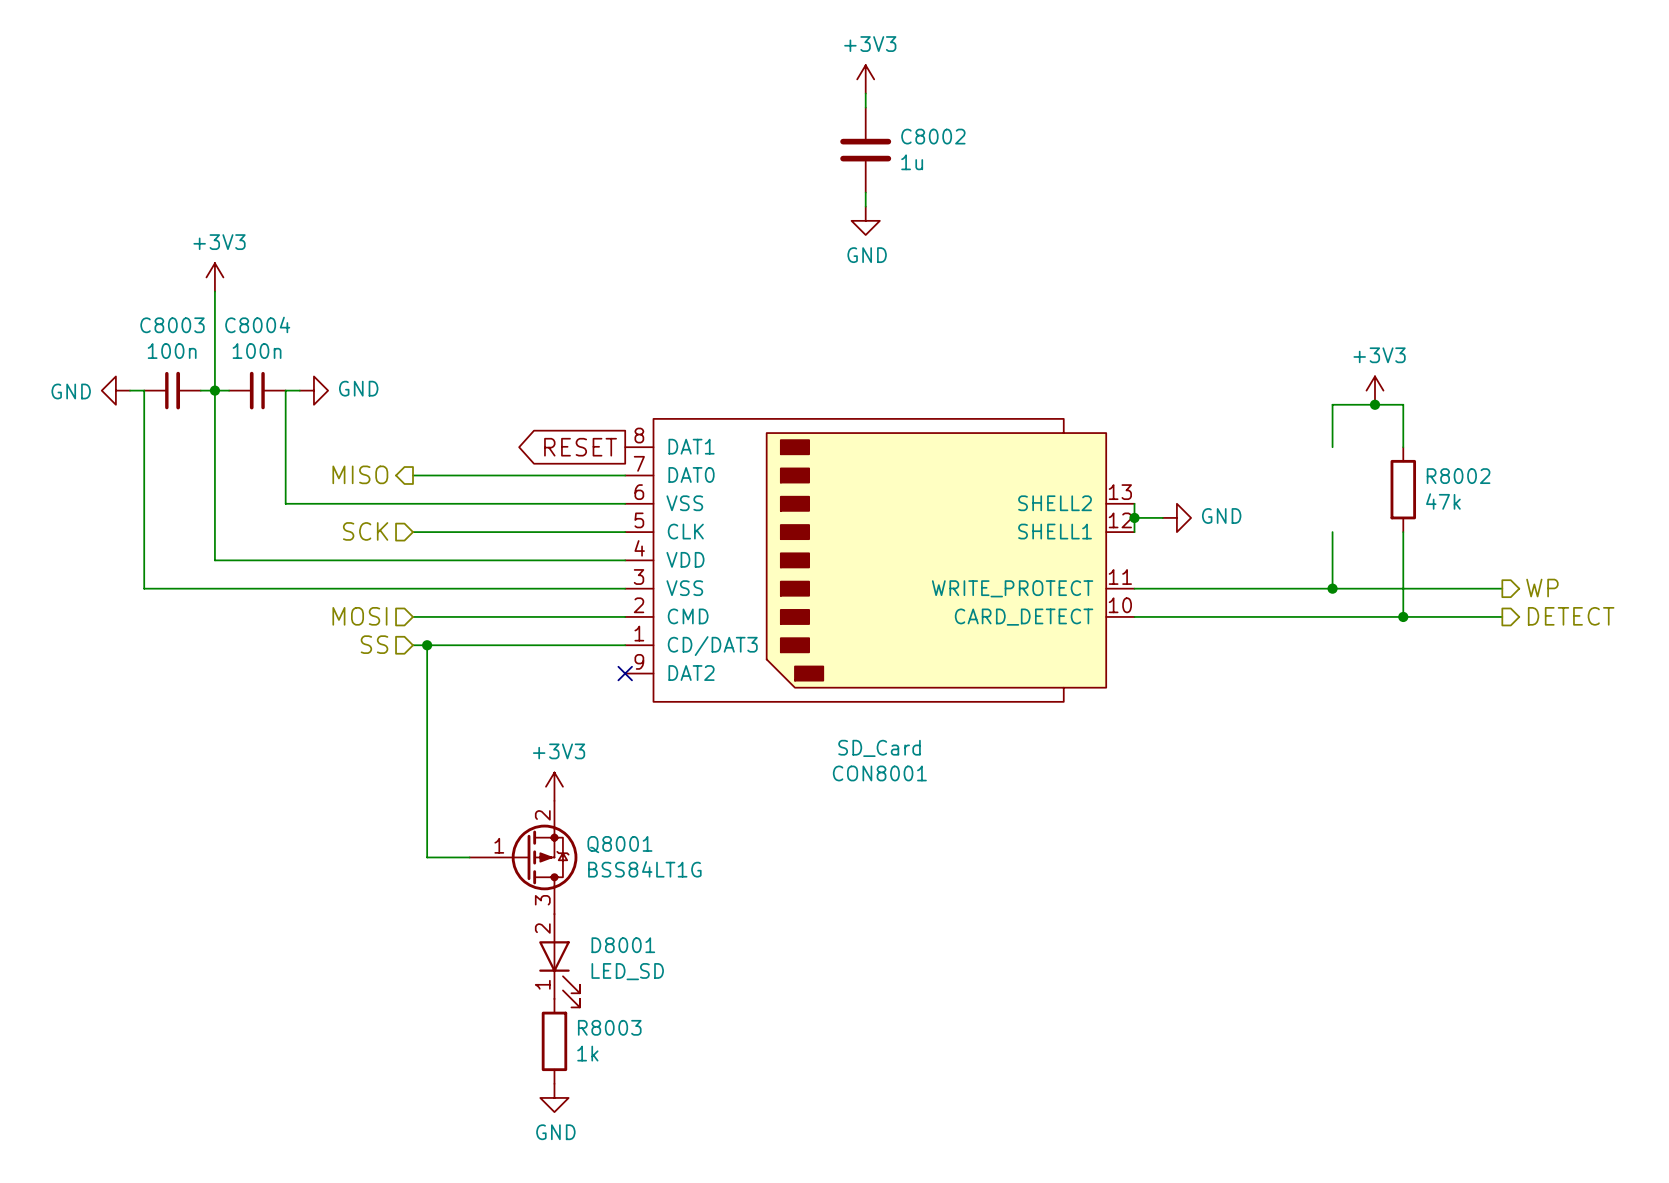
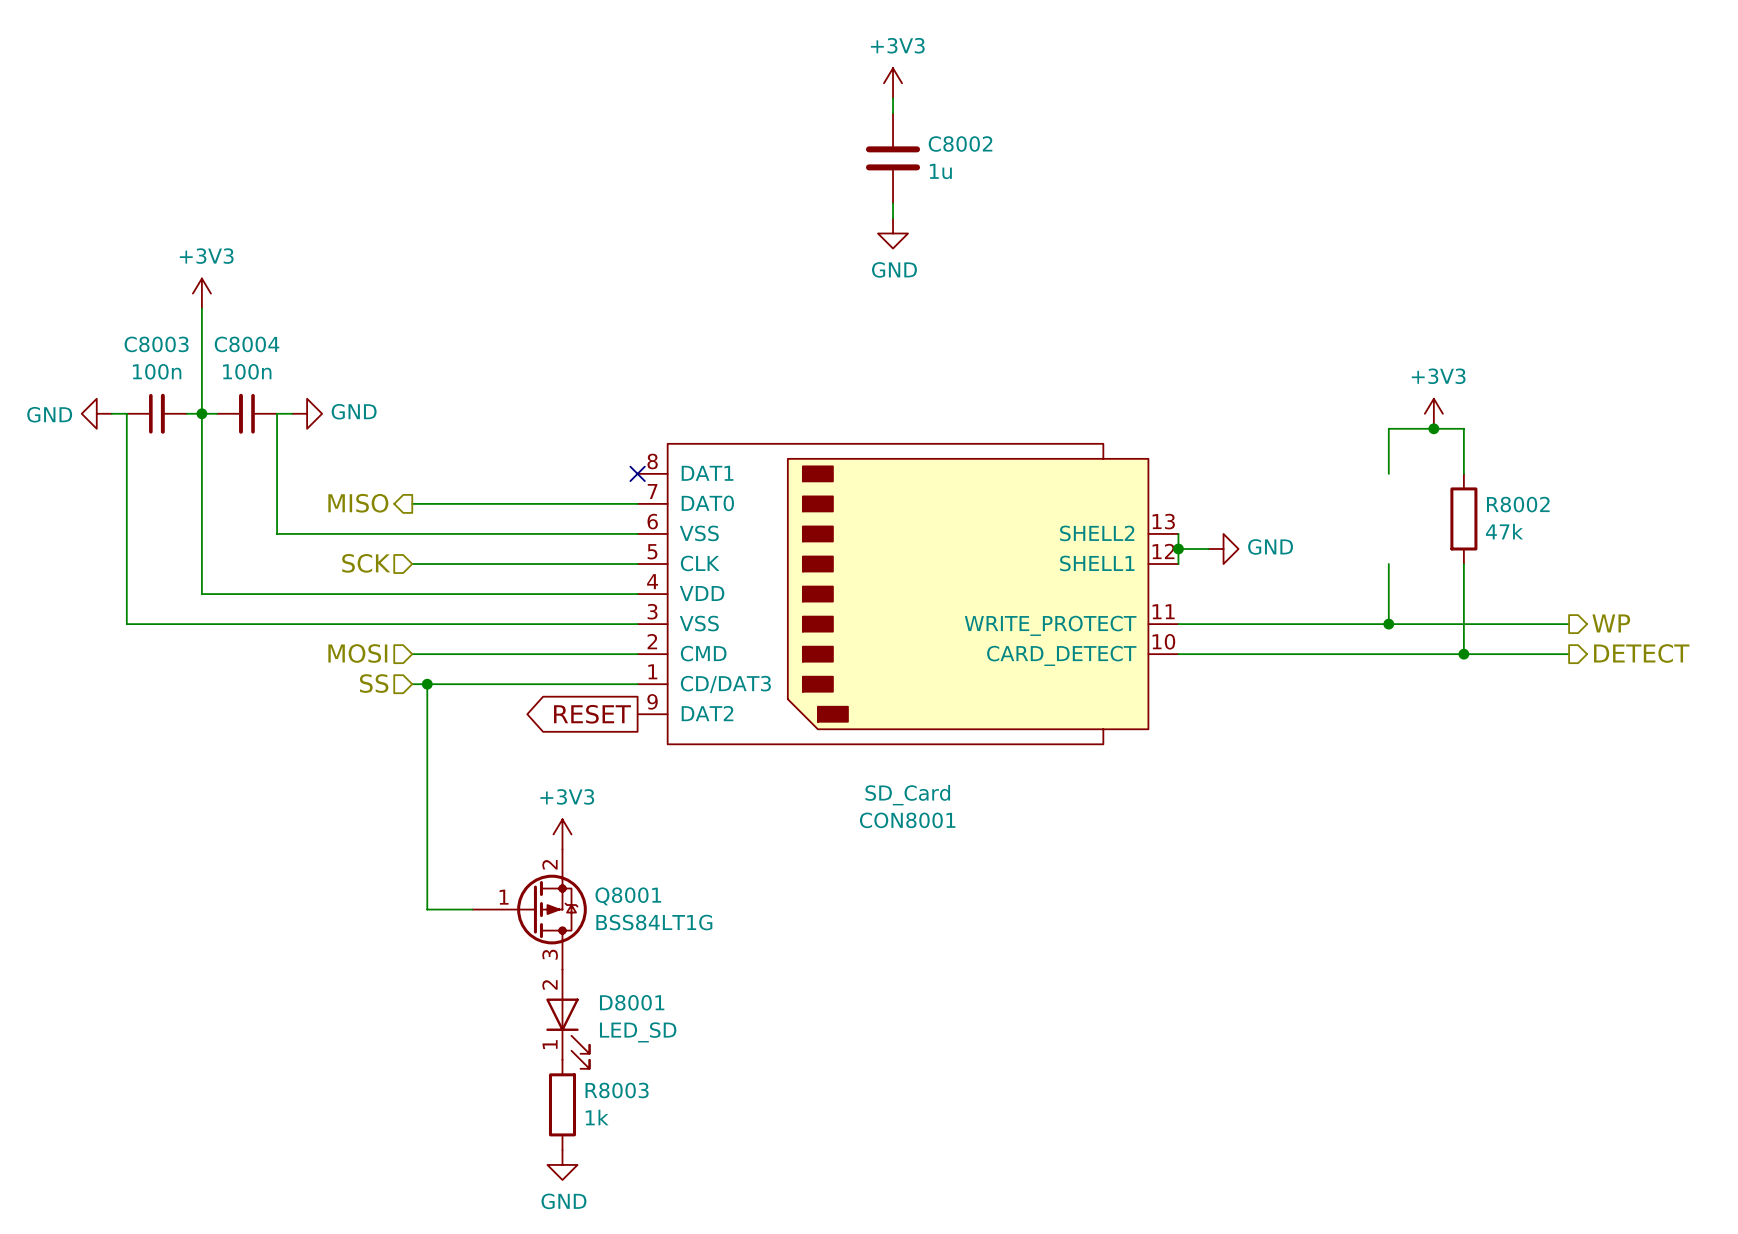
global label position: RESET (580, 447) -> RESET (592, 714)
no-connect mark: none -> (637, 473)
no-connect mark: (625, 673) -> none

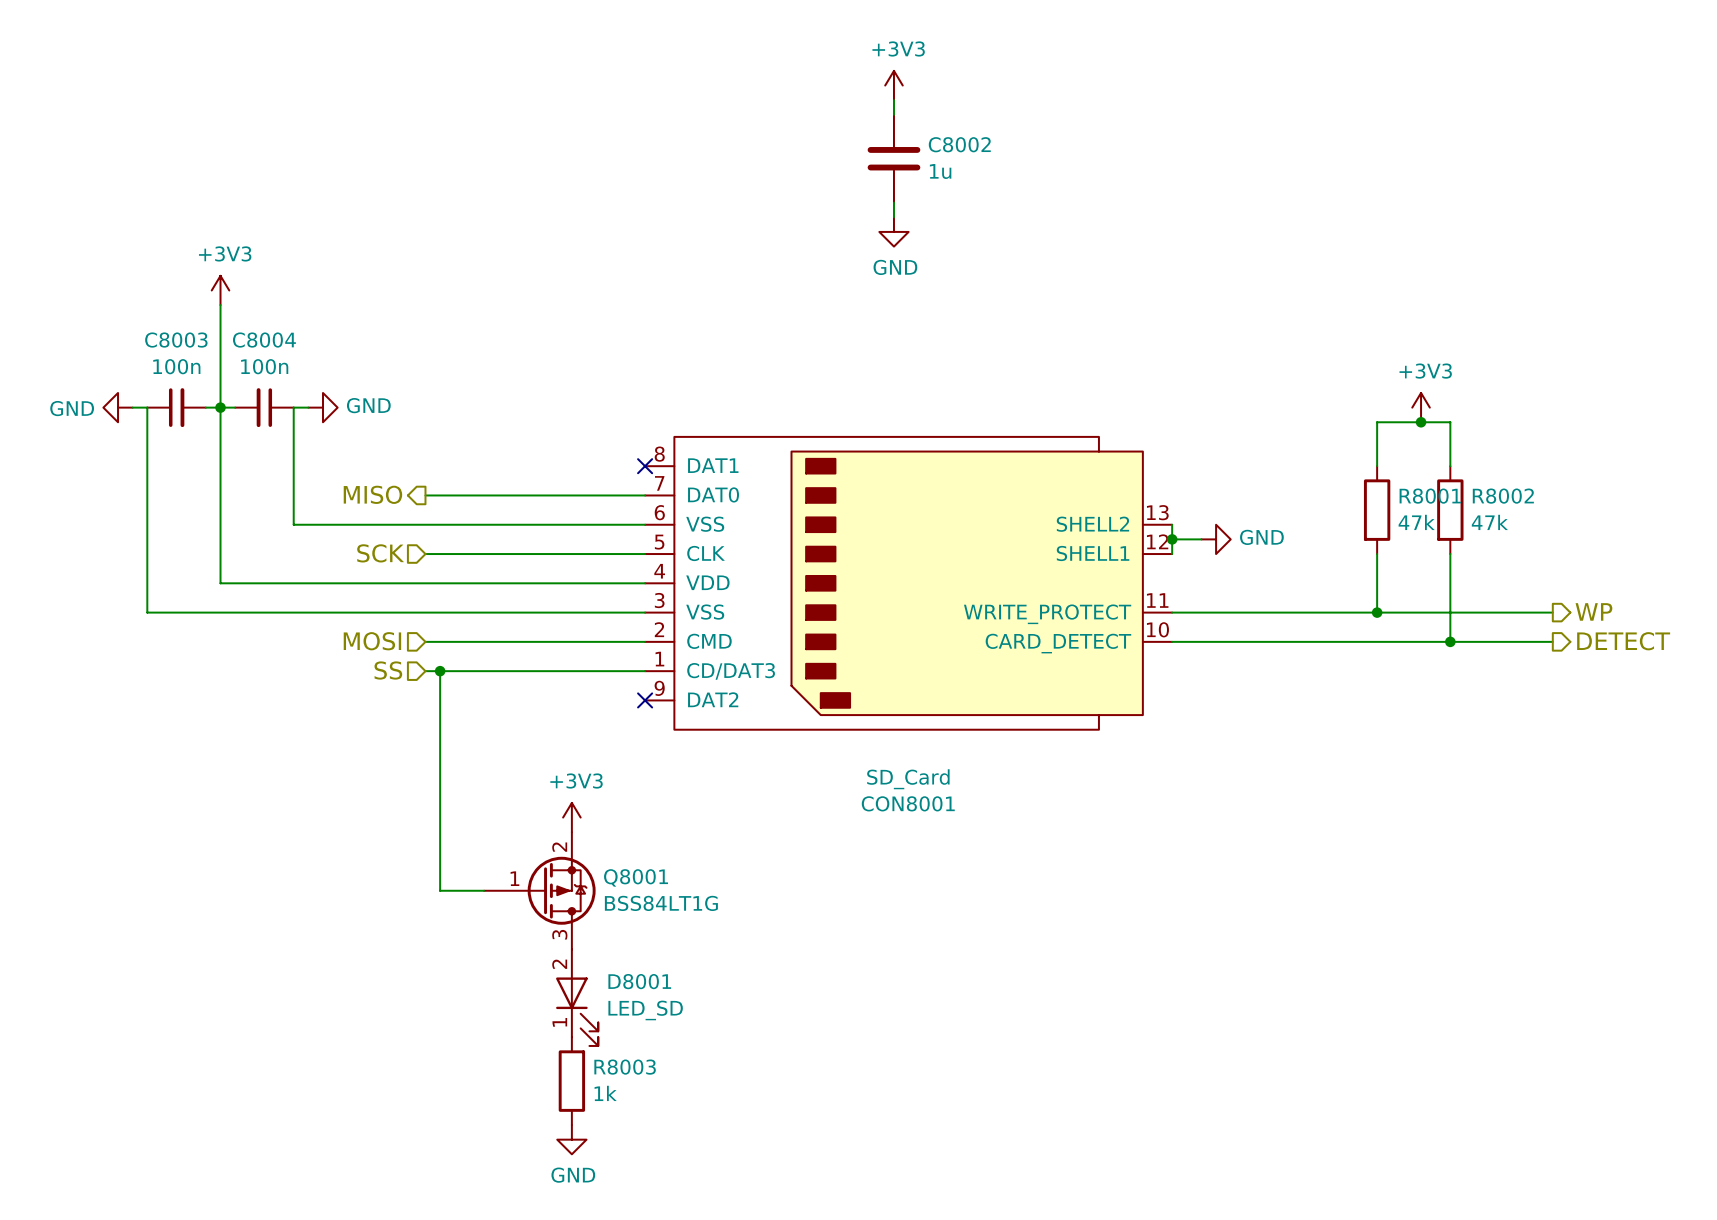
R8001: none -> 47k (1377, 510)
global label: RESET (592, 714) -> none
no-connect mark: none -> (645, 700)

